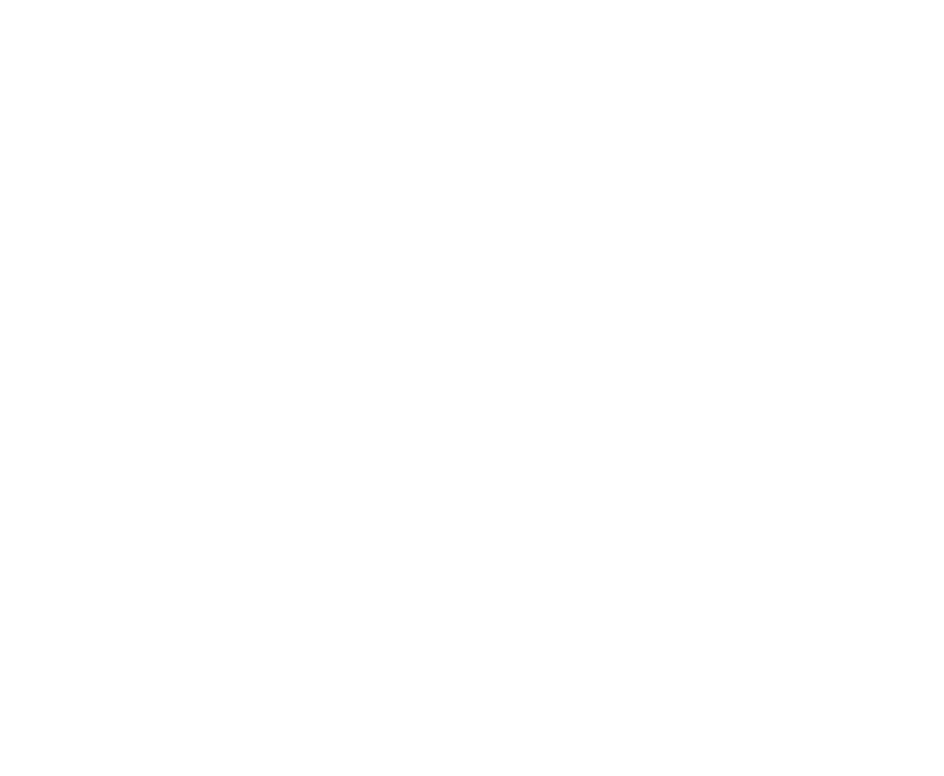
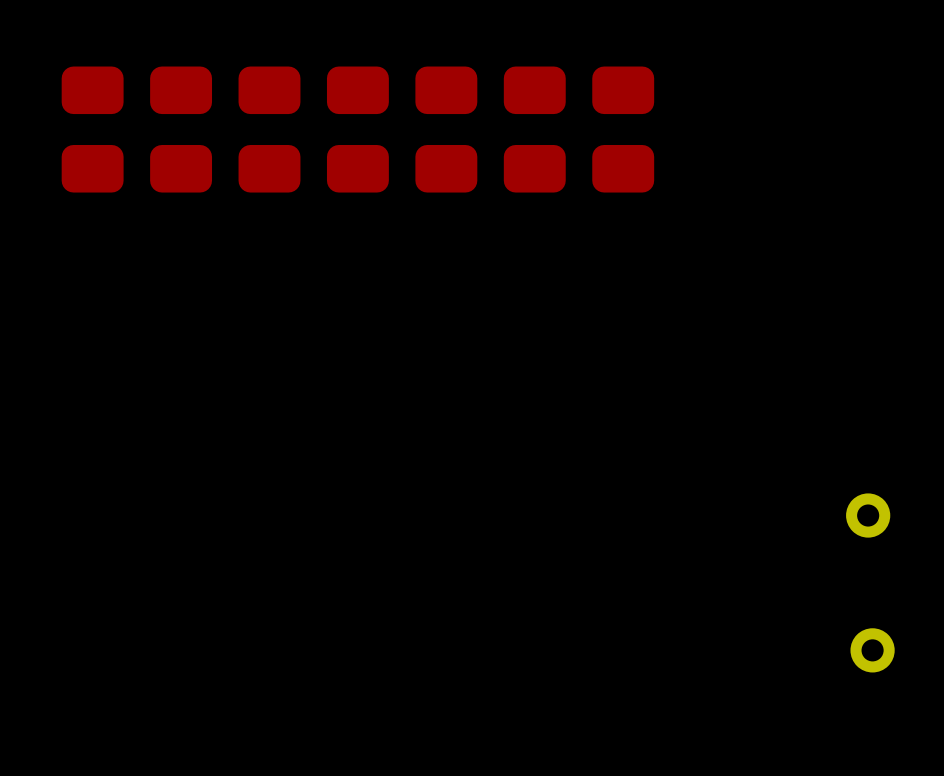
part: none -> (92, 129)
part: none -> (181, 129)
part: none -> (269, 129)
part: none -> (357, 129)
part: none -> (446, 129)
part: none -> (534, 129)
part: none -> (623, 129)
part: none -> (868, 515)
part: none -> (872, 650)

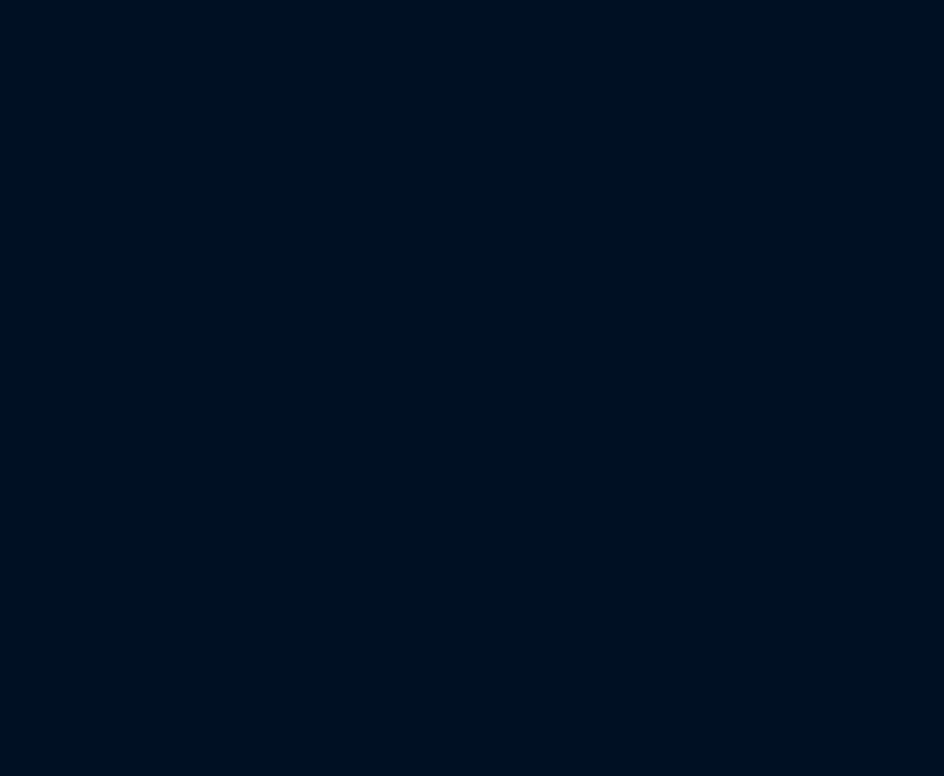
part: (92, 129) -> none
part: (181, 129) -> none
part: (269, 129) -> none
part: (357, 129) -> none
part: (446, 129) -> none
part: (534, 129) -> none
part: (623, 129) -> none
part: (868, 515) -> none
part: (872, 650) -> none

